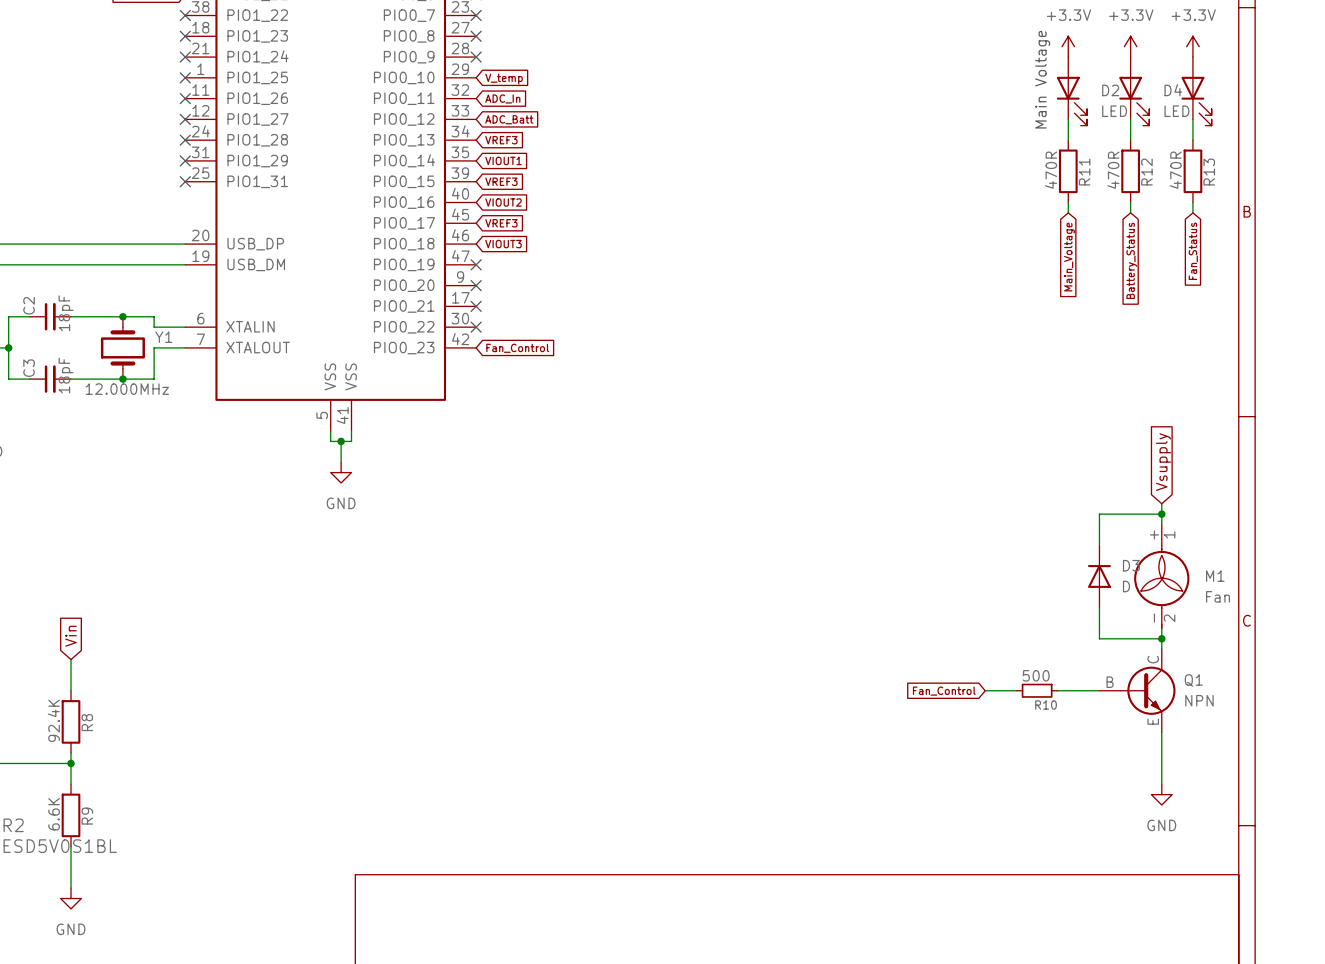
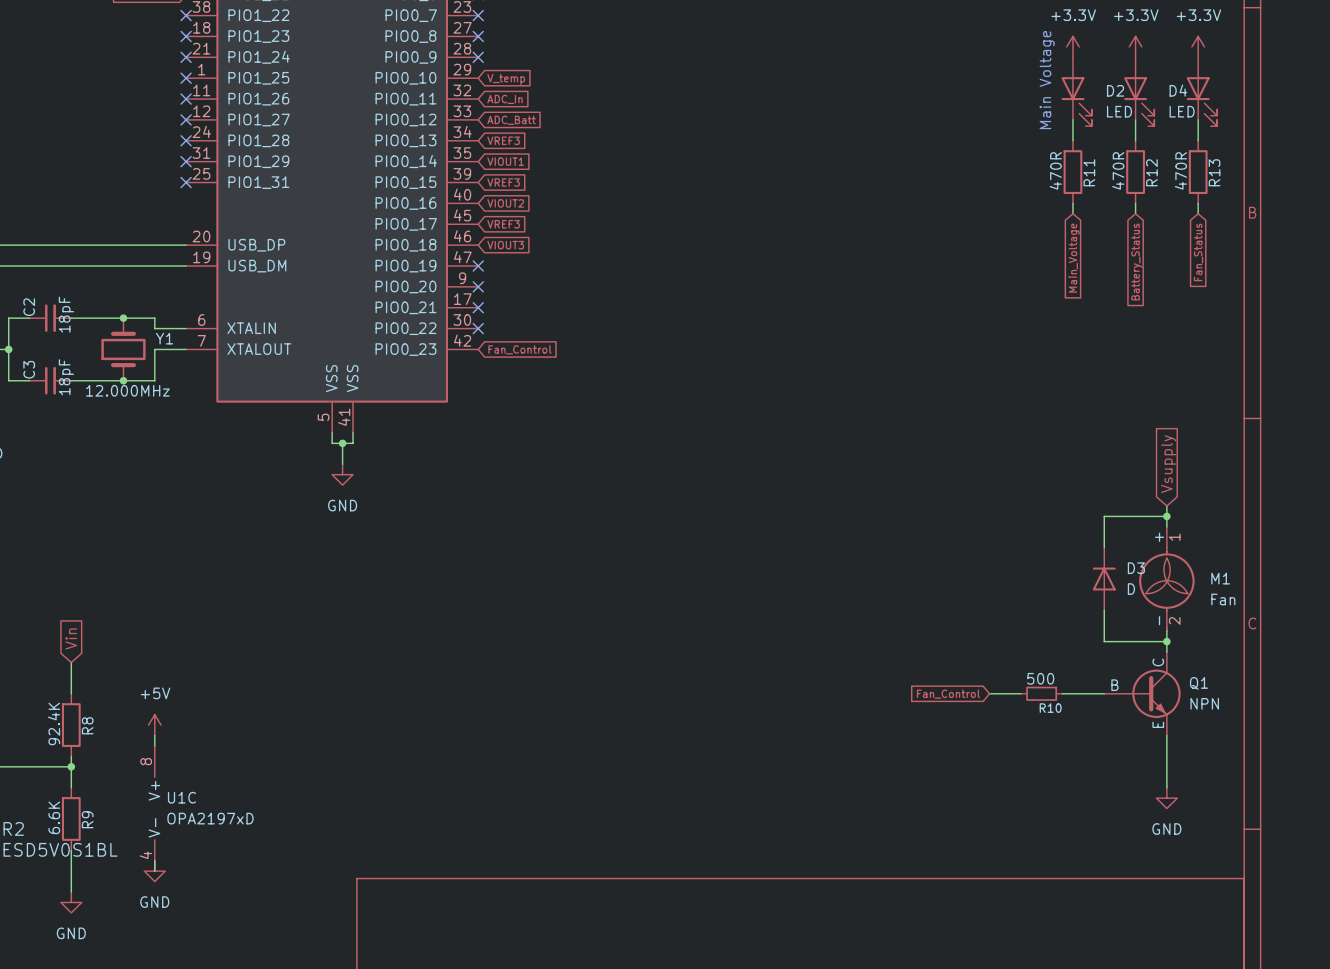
power symbol: none -> +5V (154, 725)
wire: none -> (154, 735) (154, 745)
U1C: none -> OPA2197xD (154, 808)
wire: none -> (154, 860) (154, 871)
power symbol: none -> GND (154, 871)

